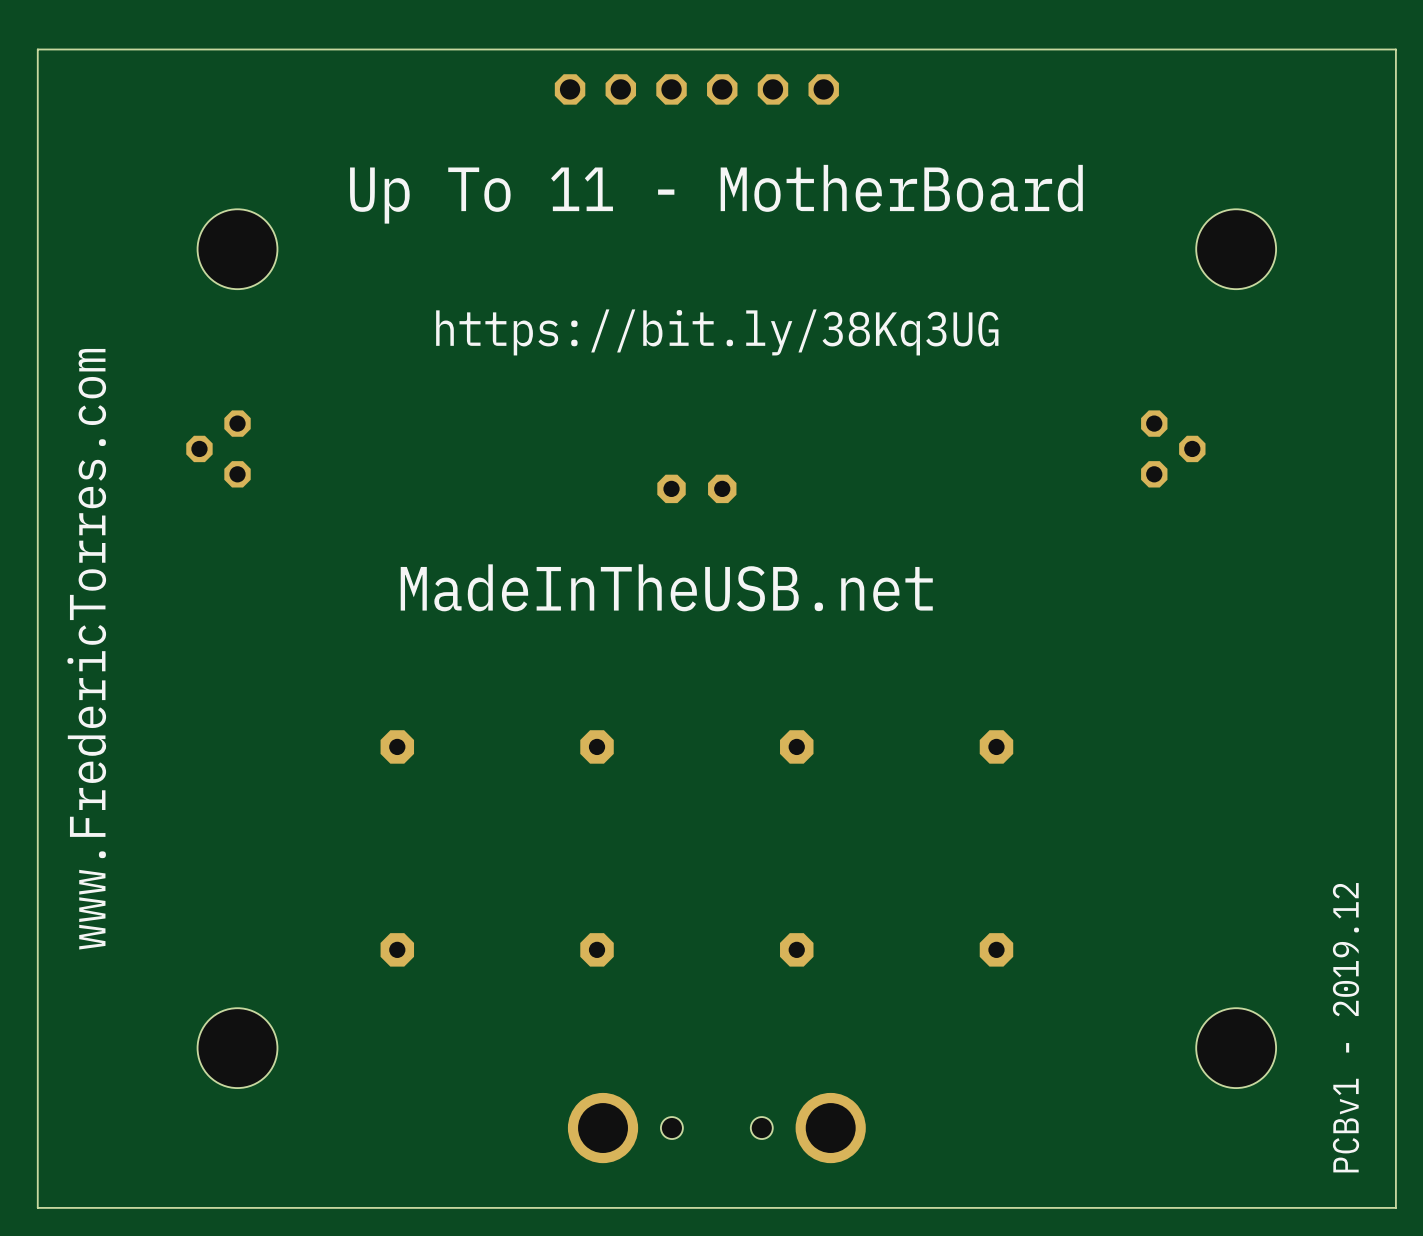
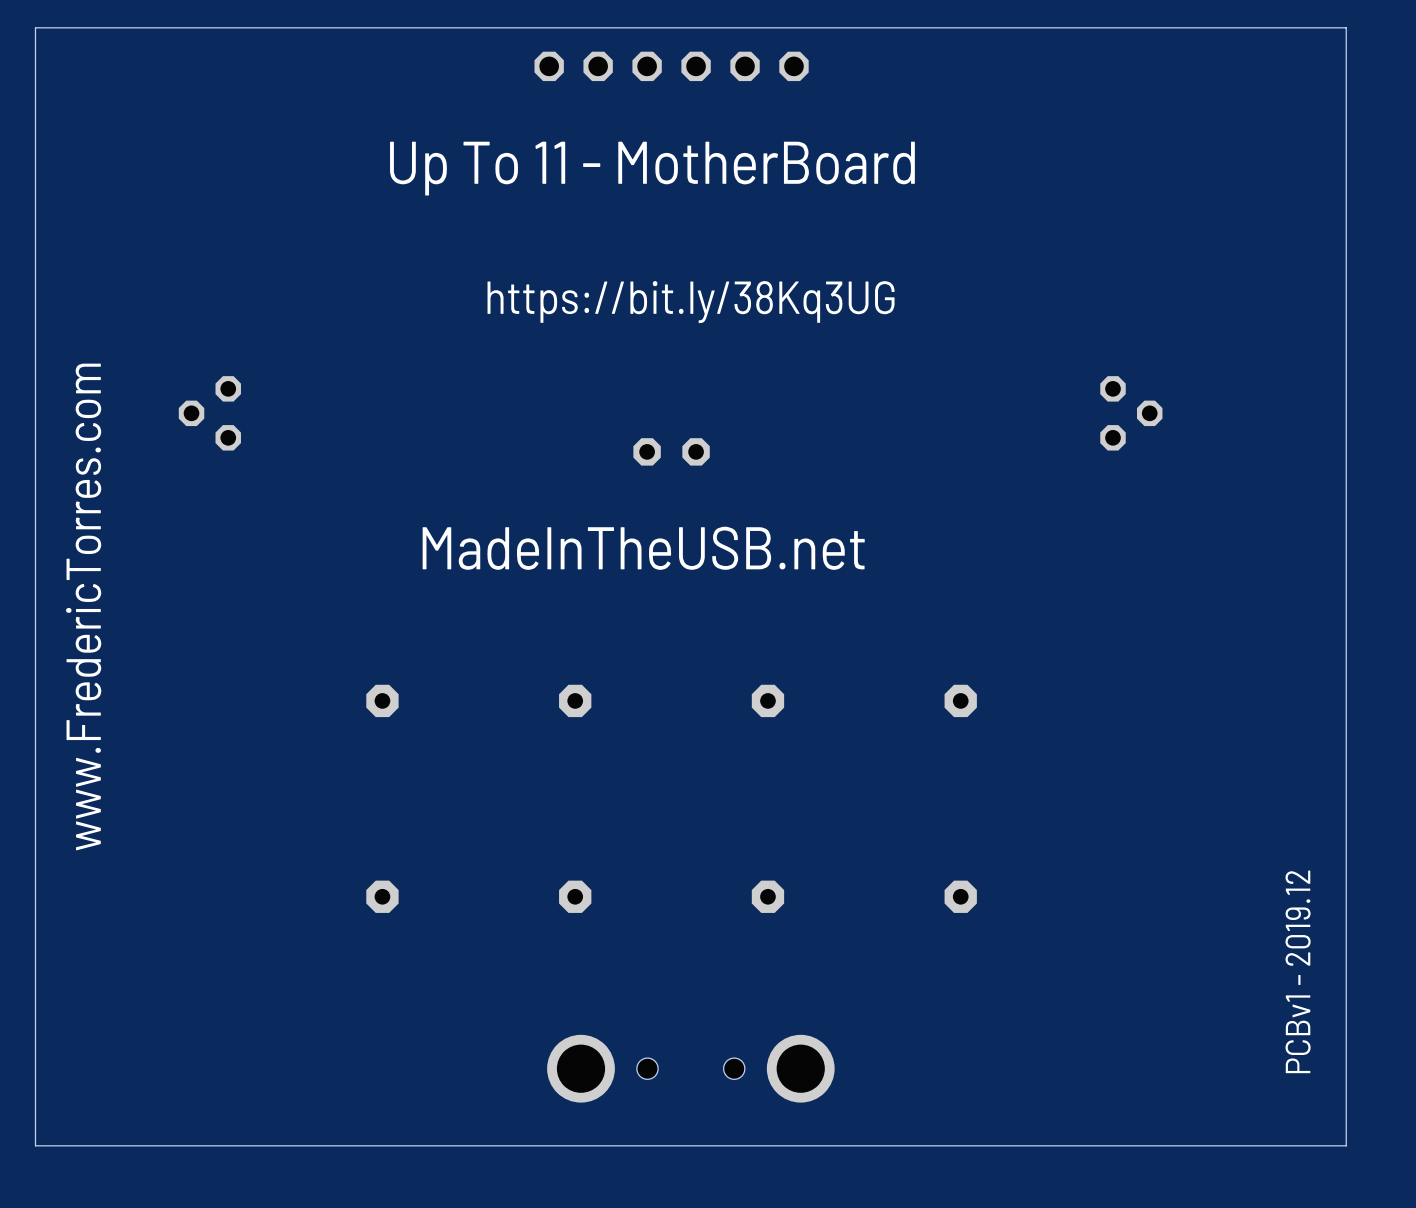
text position: Up To 11 - MotherBoard (716, 194) -> Up To 11 - MotherBoard (652, 168)
hole: (237, 249) -> none
hole: (1236, 249) -> none
hole: (237, 1048) -> none
hole: (1236, 1048) -> none

